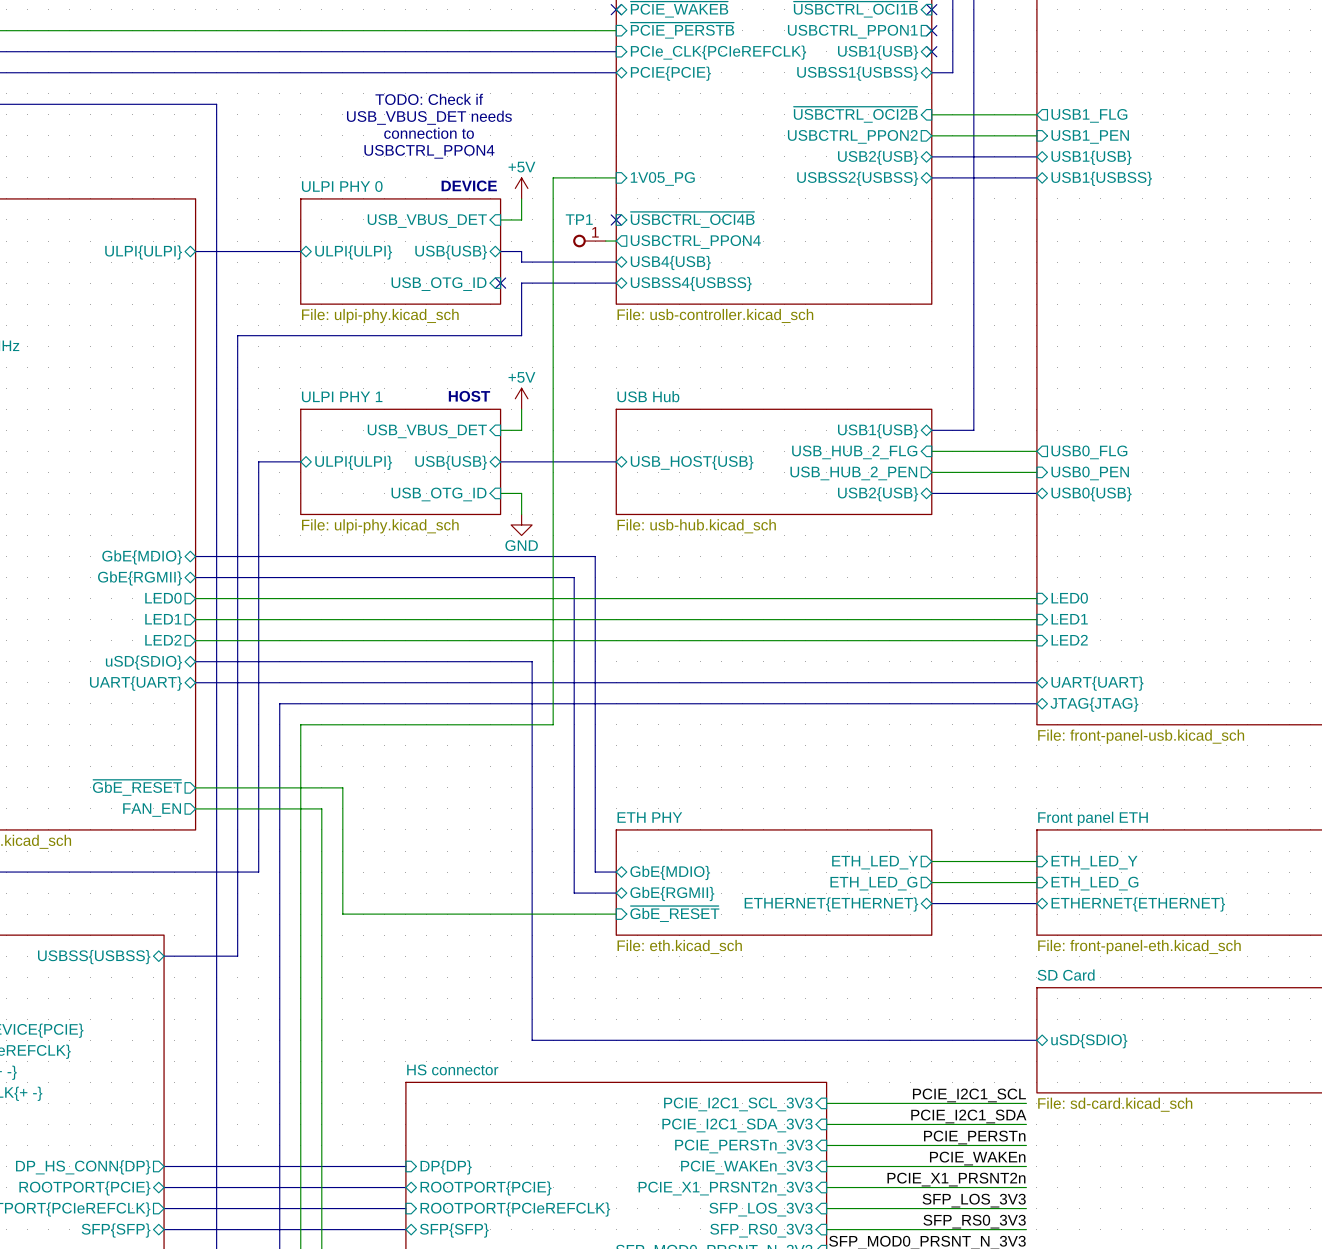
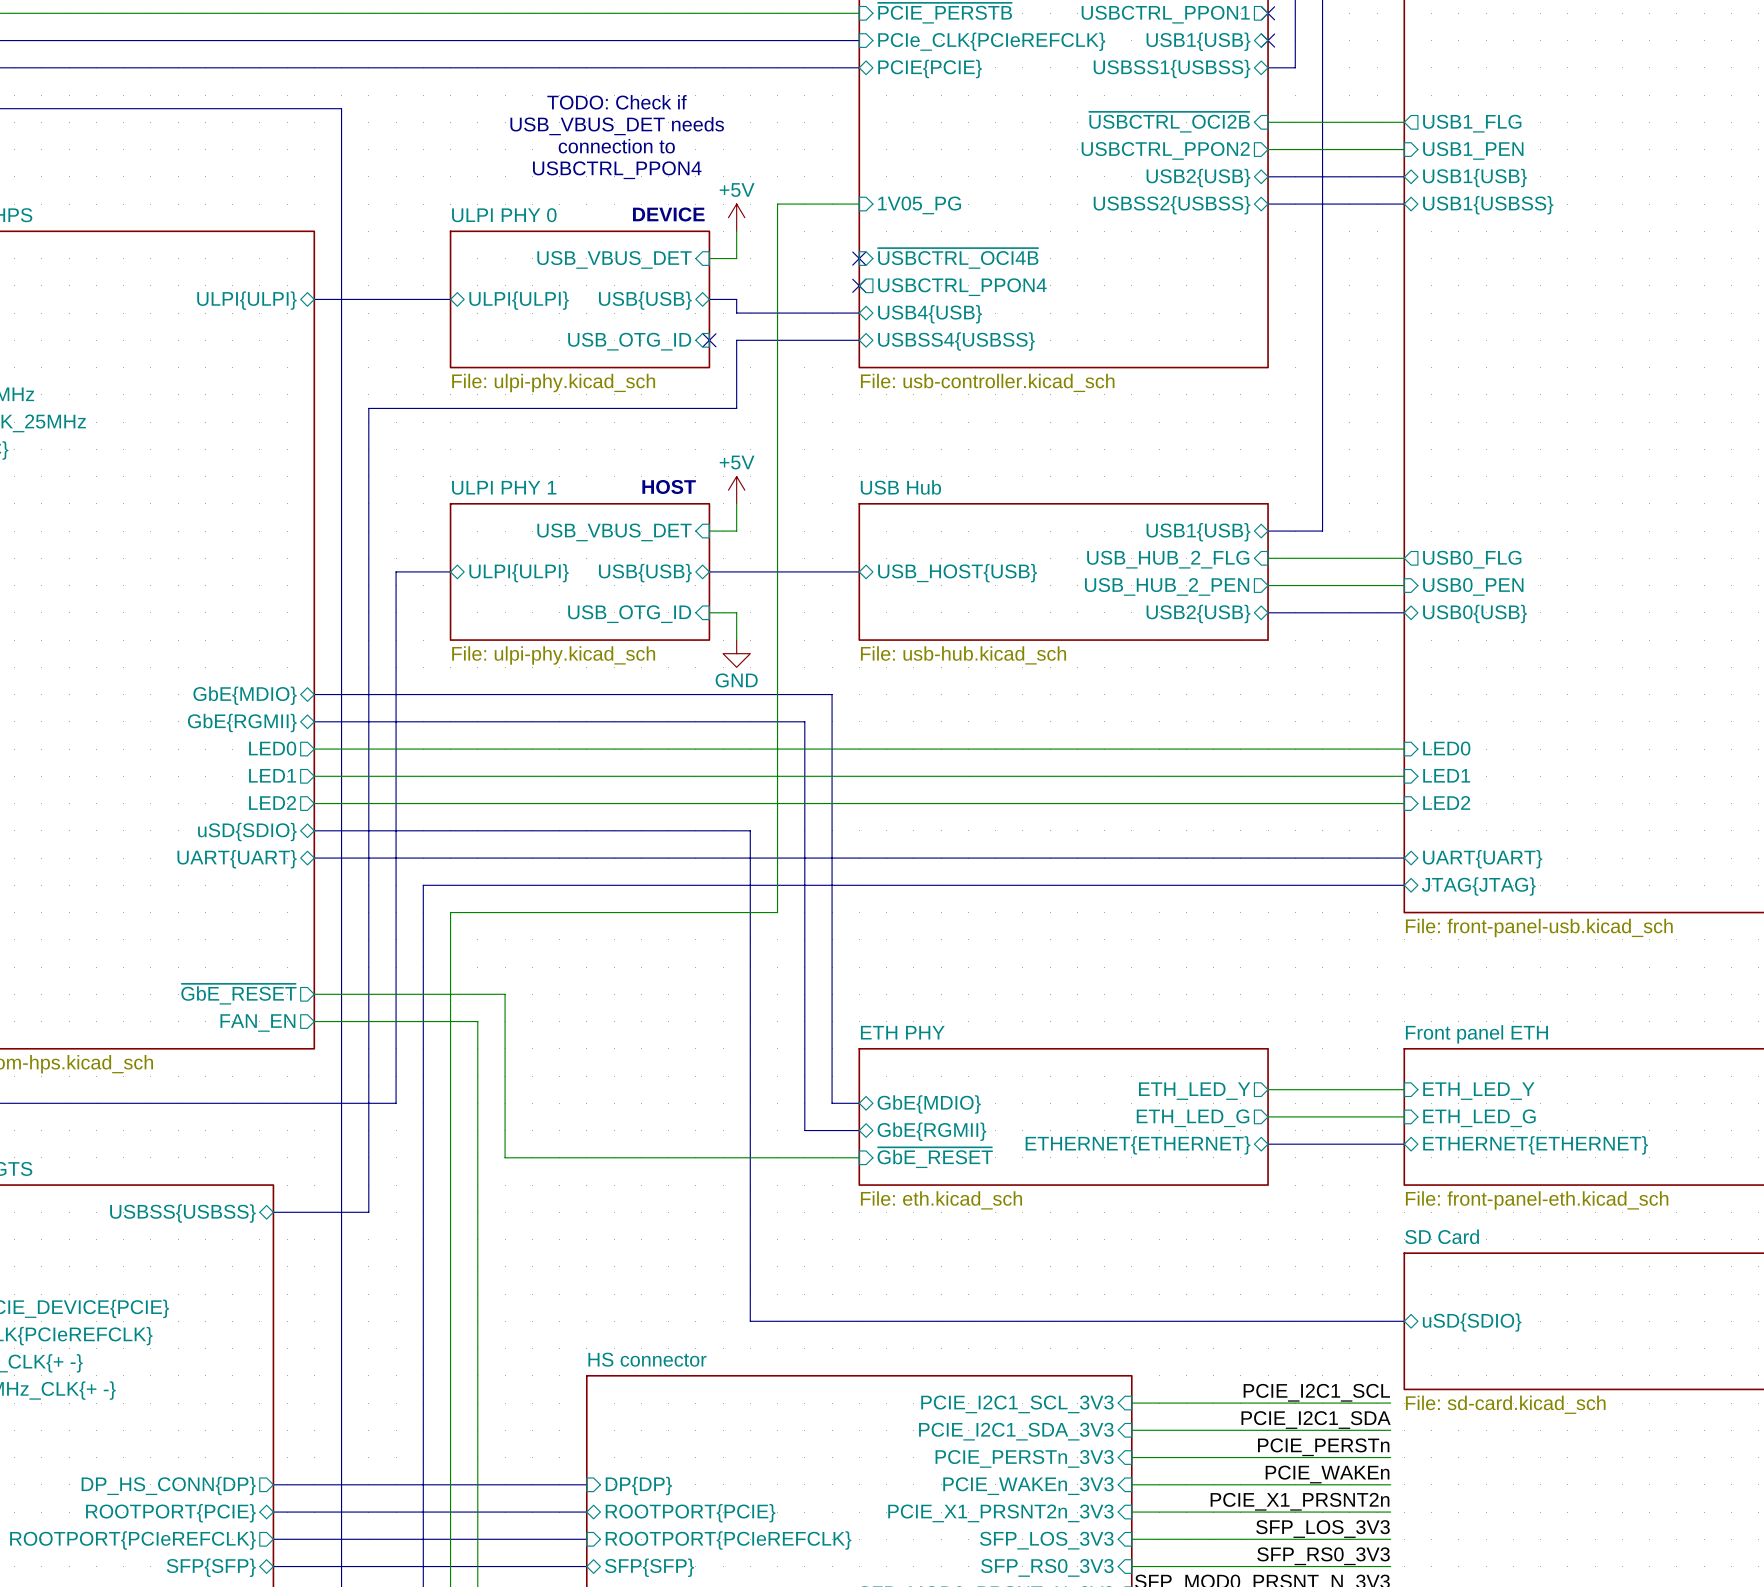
TP1: (589, 241) -> none
wire: (605, 241) (616, 241) -> none
no-connect mark: none -> (859, 285)

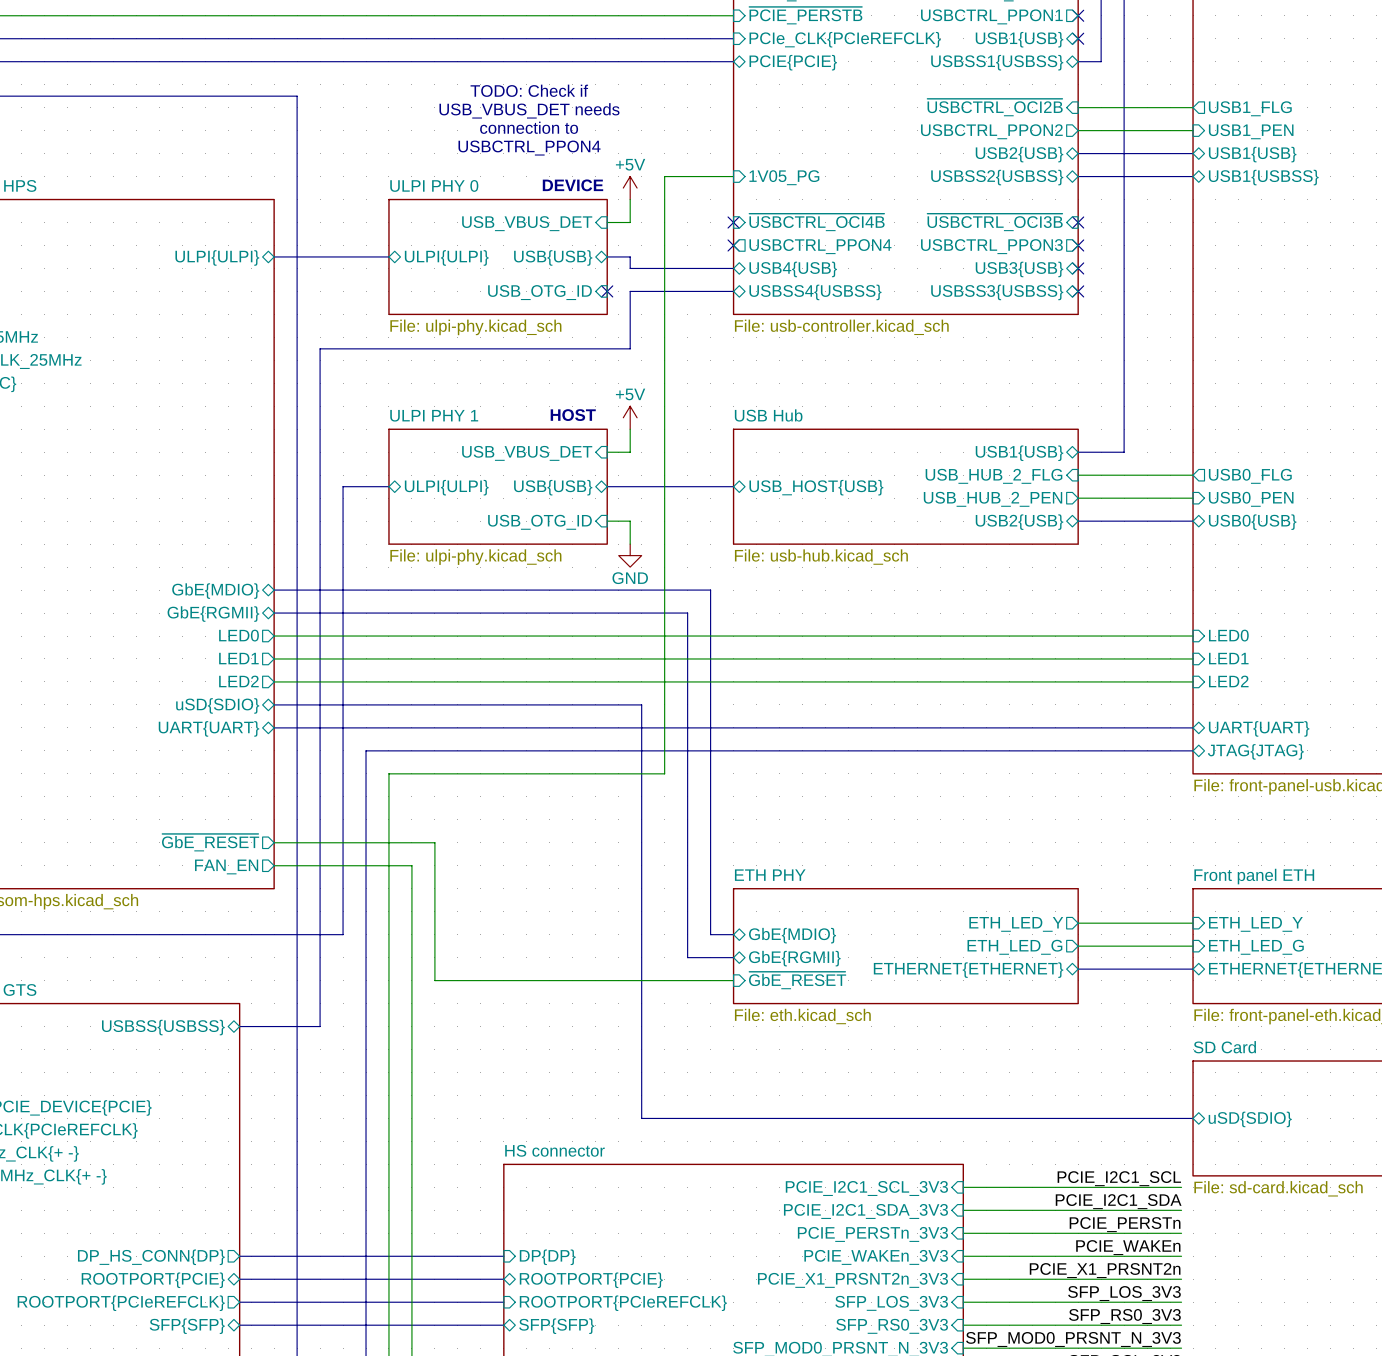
sheet pin: none -> ~{USBCTRL_OCI3B} (995, 222)
no-connect mark: none -> (1078, 222)
no-connect mark: none -> (1078, 245)
sheet pin: none -> USBCTRL_PPON3 (991, 246)
no-connect mark: none -> (1078, 268)
sheet pin: none -> USB3{USB} (1019, 269)
no-connect mark: none -> (1078, 291)
sheet pin: none -> USBSS3{USBSS} (997, 292)

